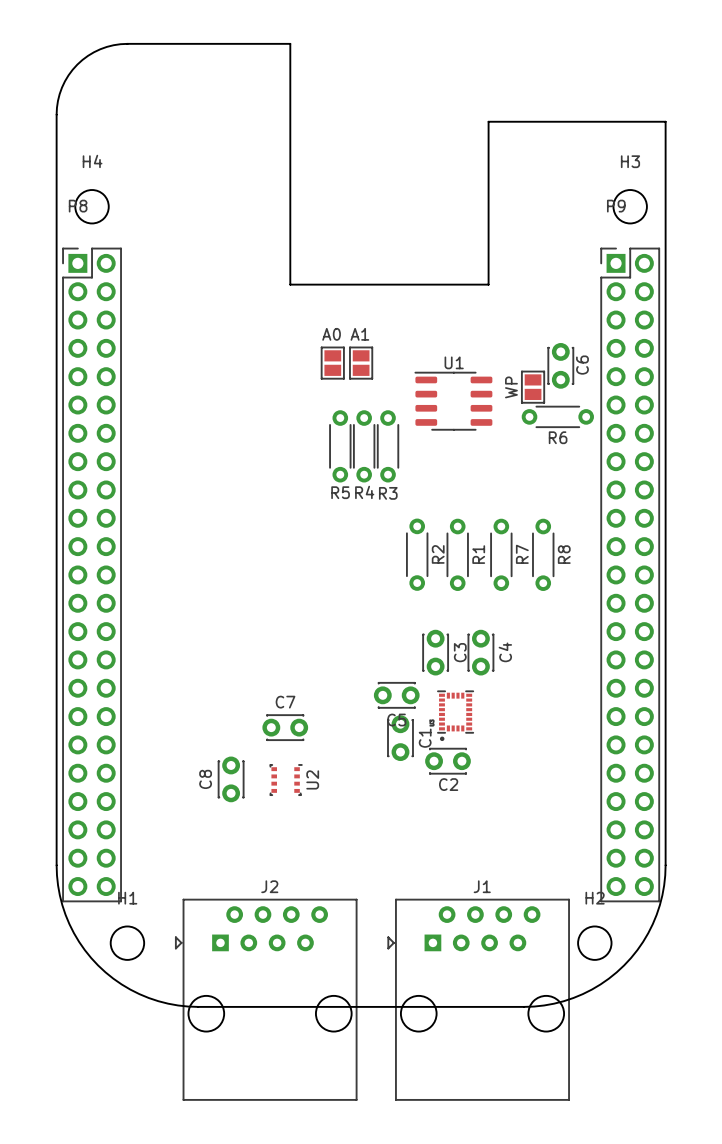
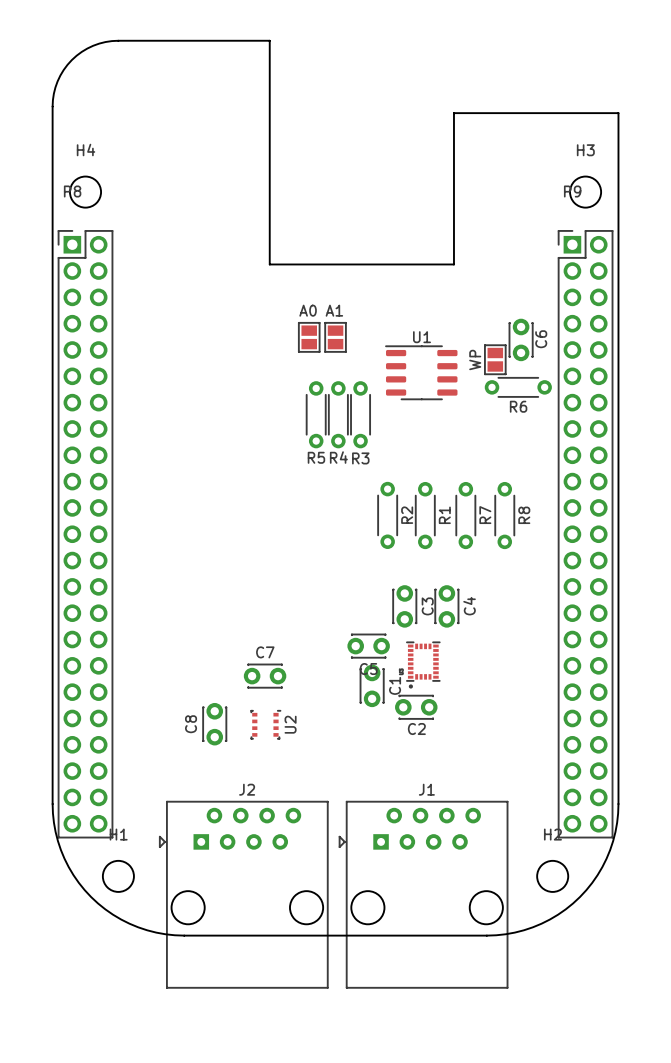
J2 position: (266, 999) -> (243, 894)
J1 position: (478, 999) -> (423, 894)

